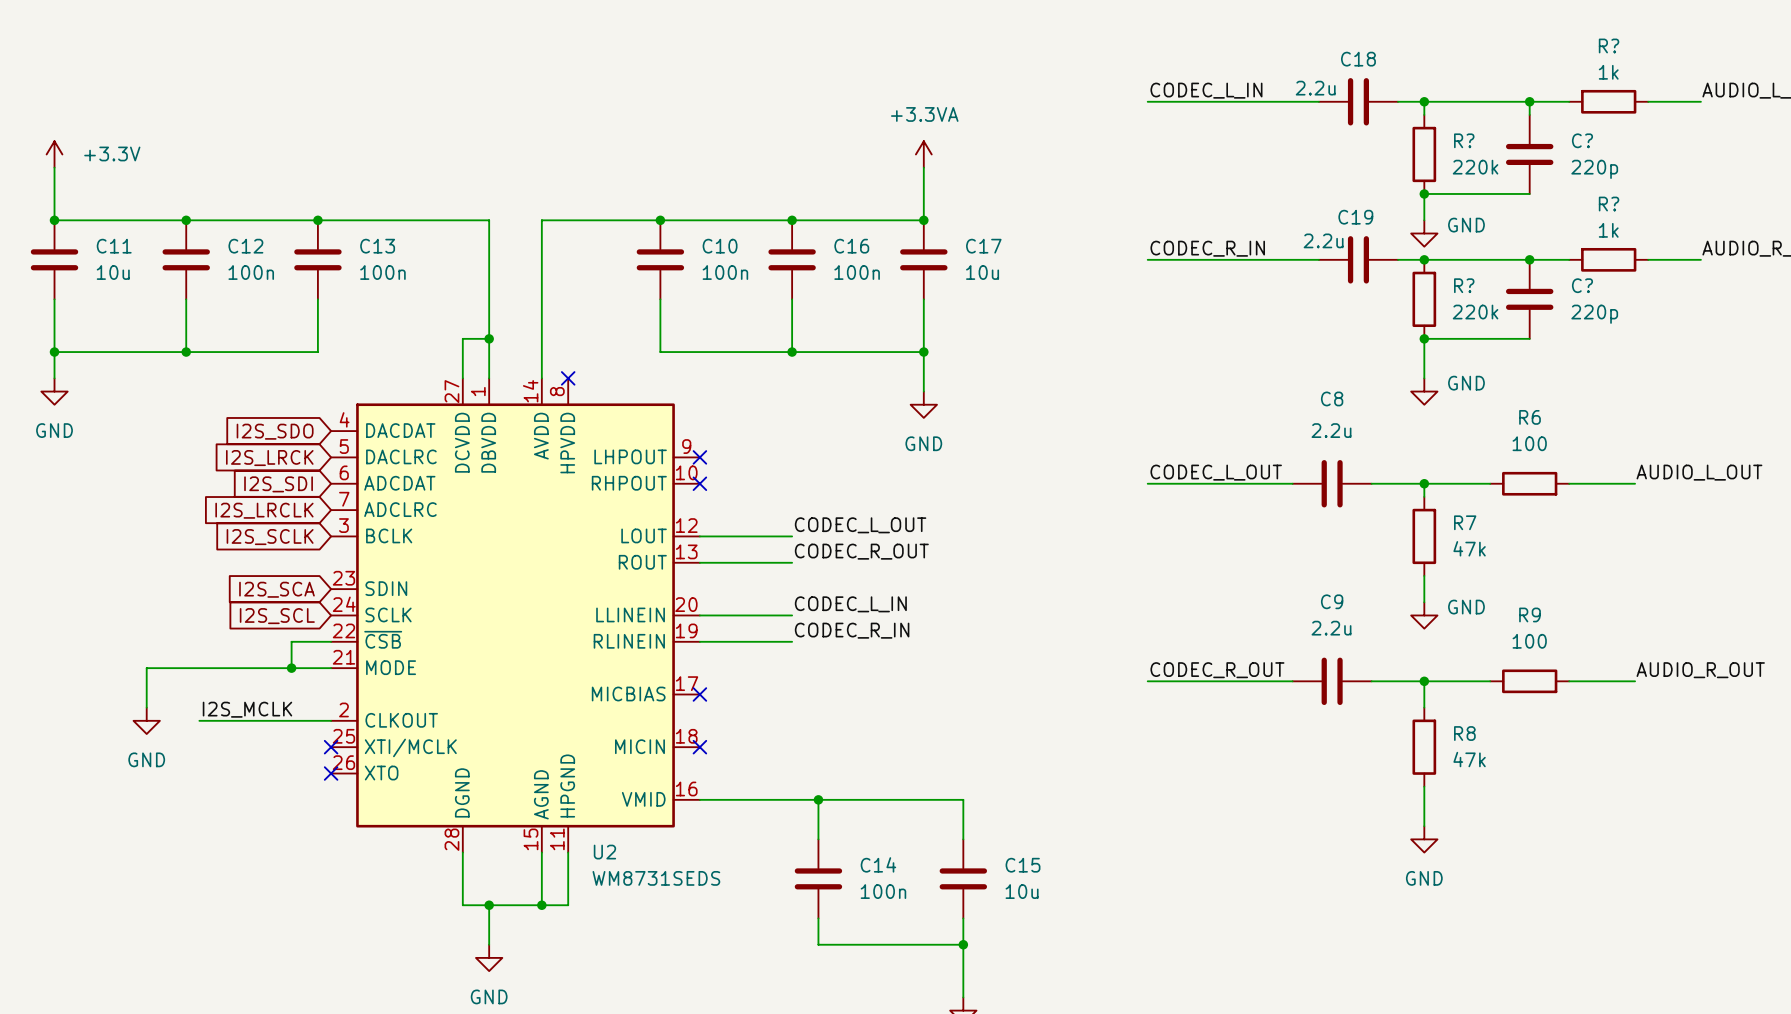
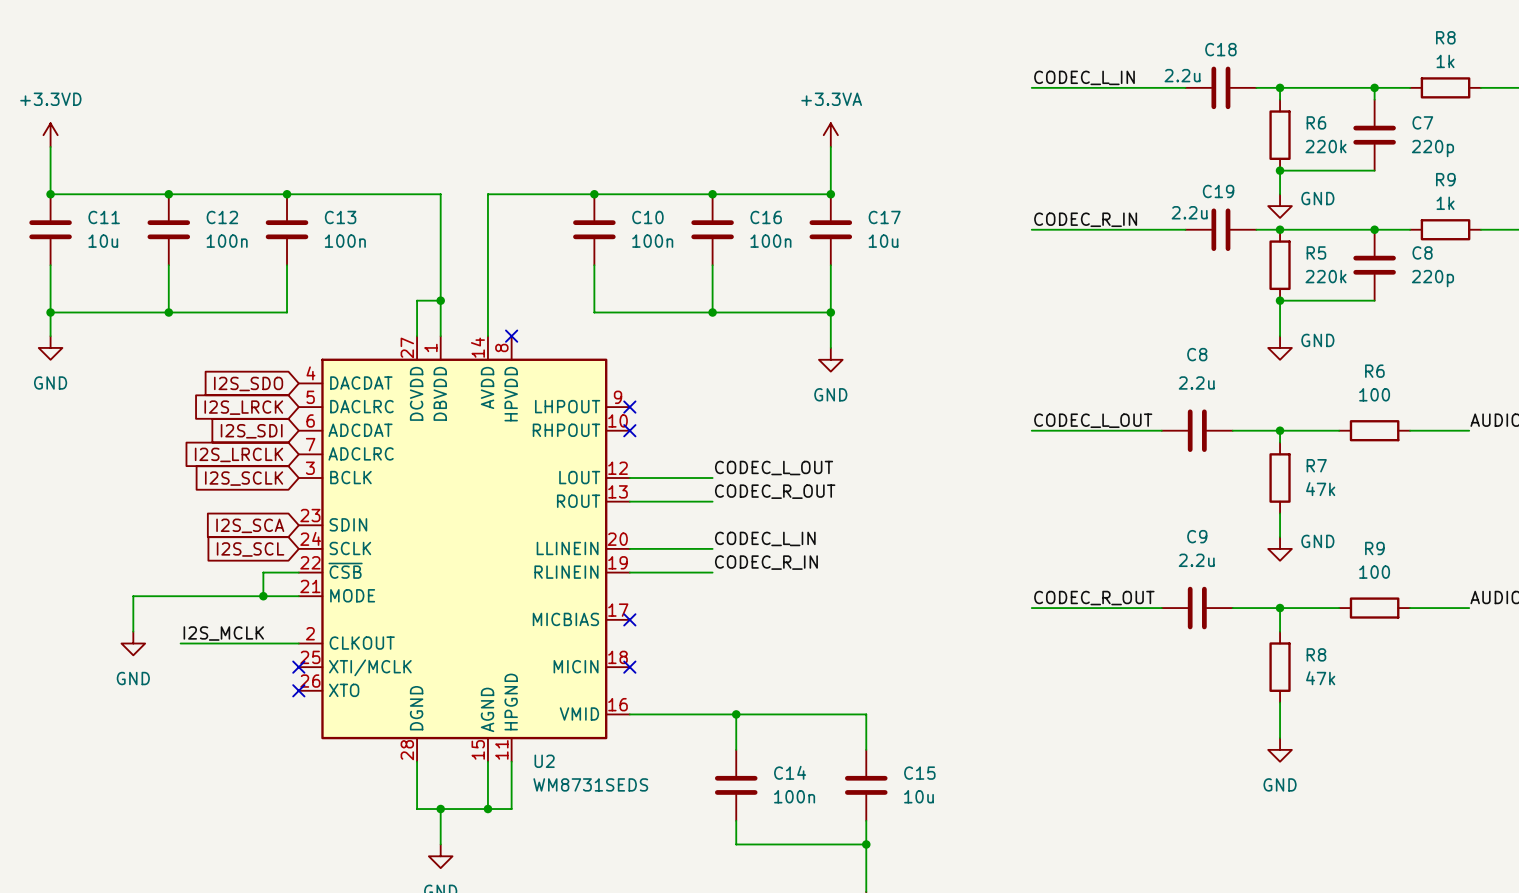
R? name: R? (1609, 45) -> R8 (1445, 37)
R? name: R? (1464, 140) -> R6 (1316, 122)
C? name: C? (1582, 140) -> C7 (1422, 122)
power symbol: +3.3V (54, 154) -> +3.3VD (50, 135)
R? name: R? (1609, 204) -> R9 (1445, 179)
R? name: R? (1464, 285) -> R5 (1316, 252)
C? name: C? (1582, 285) -> C8 (1422, 252)

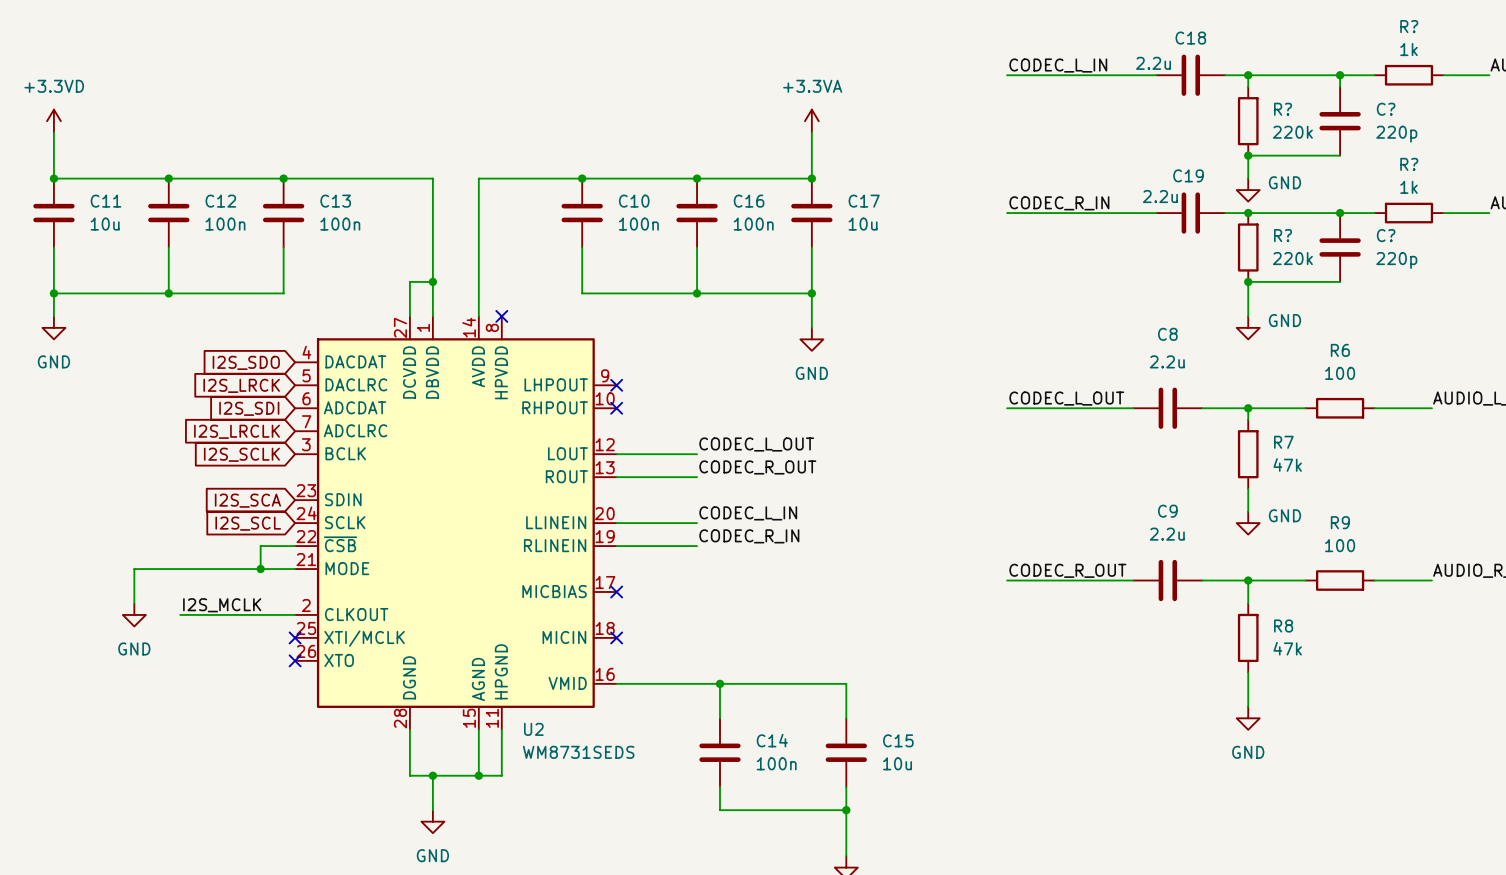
R8 name: R8 (1445, 37) -> R? (1409, 26)
R6 name: R6 (1316, 122) -> R? (1283, 109)
C7 name: C7 (1422, 122) -> C? (1386, 109)
R9 name: R9 (1445, 179) -> R? (1409, 164)
R5 name: R5 (1316, 252) -> R? (1283, 235)
C8 name: C8 (1422, 252) -> C? (1386, 235)

